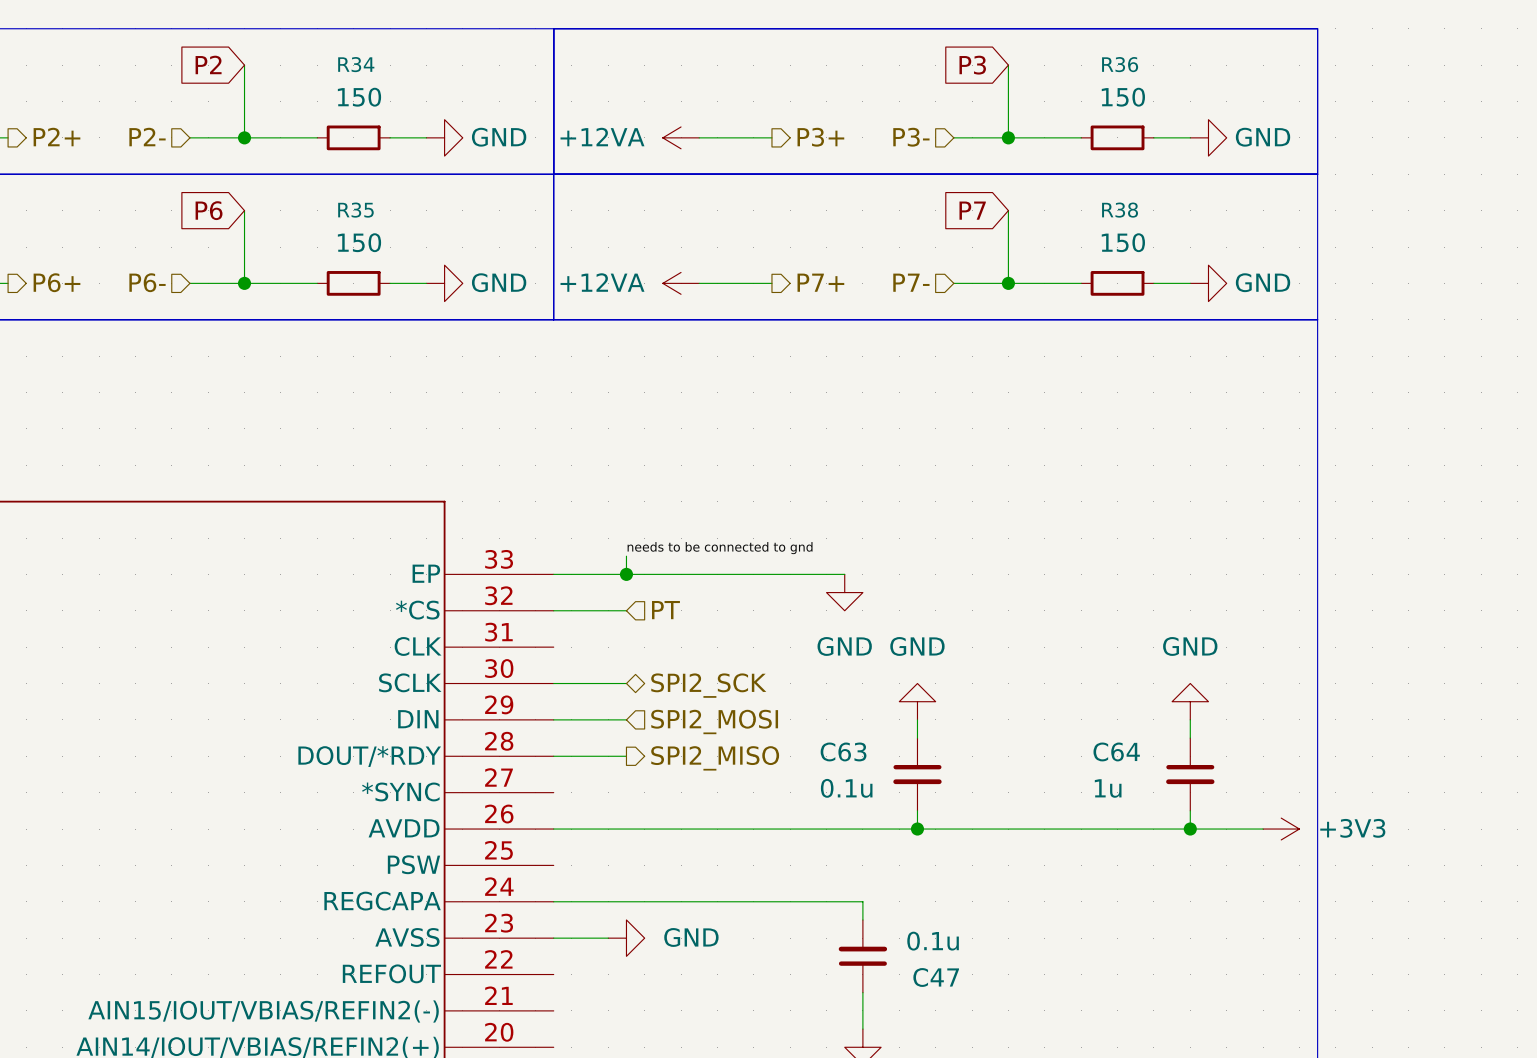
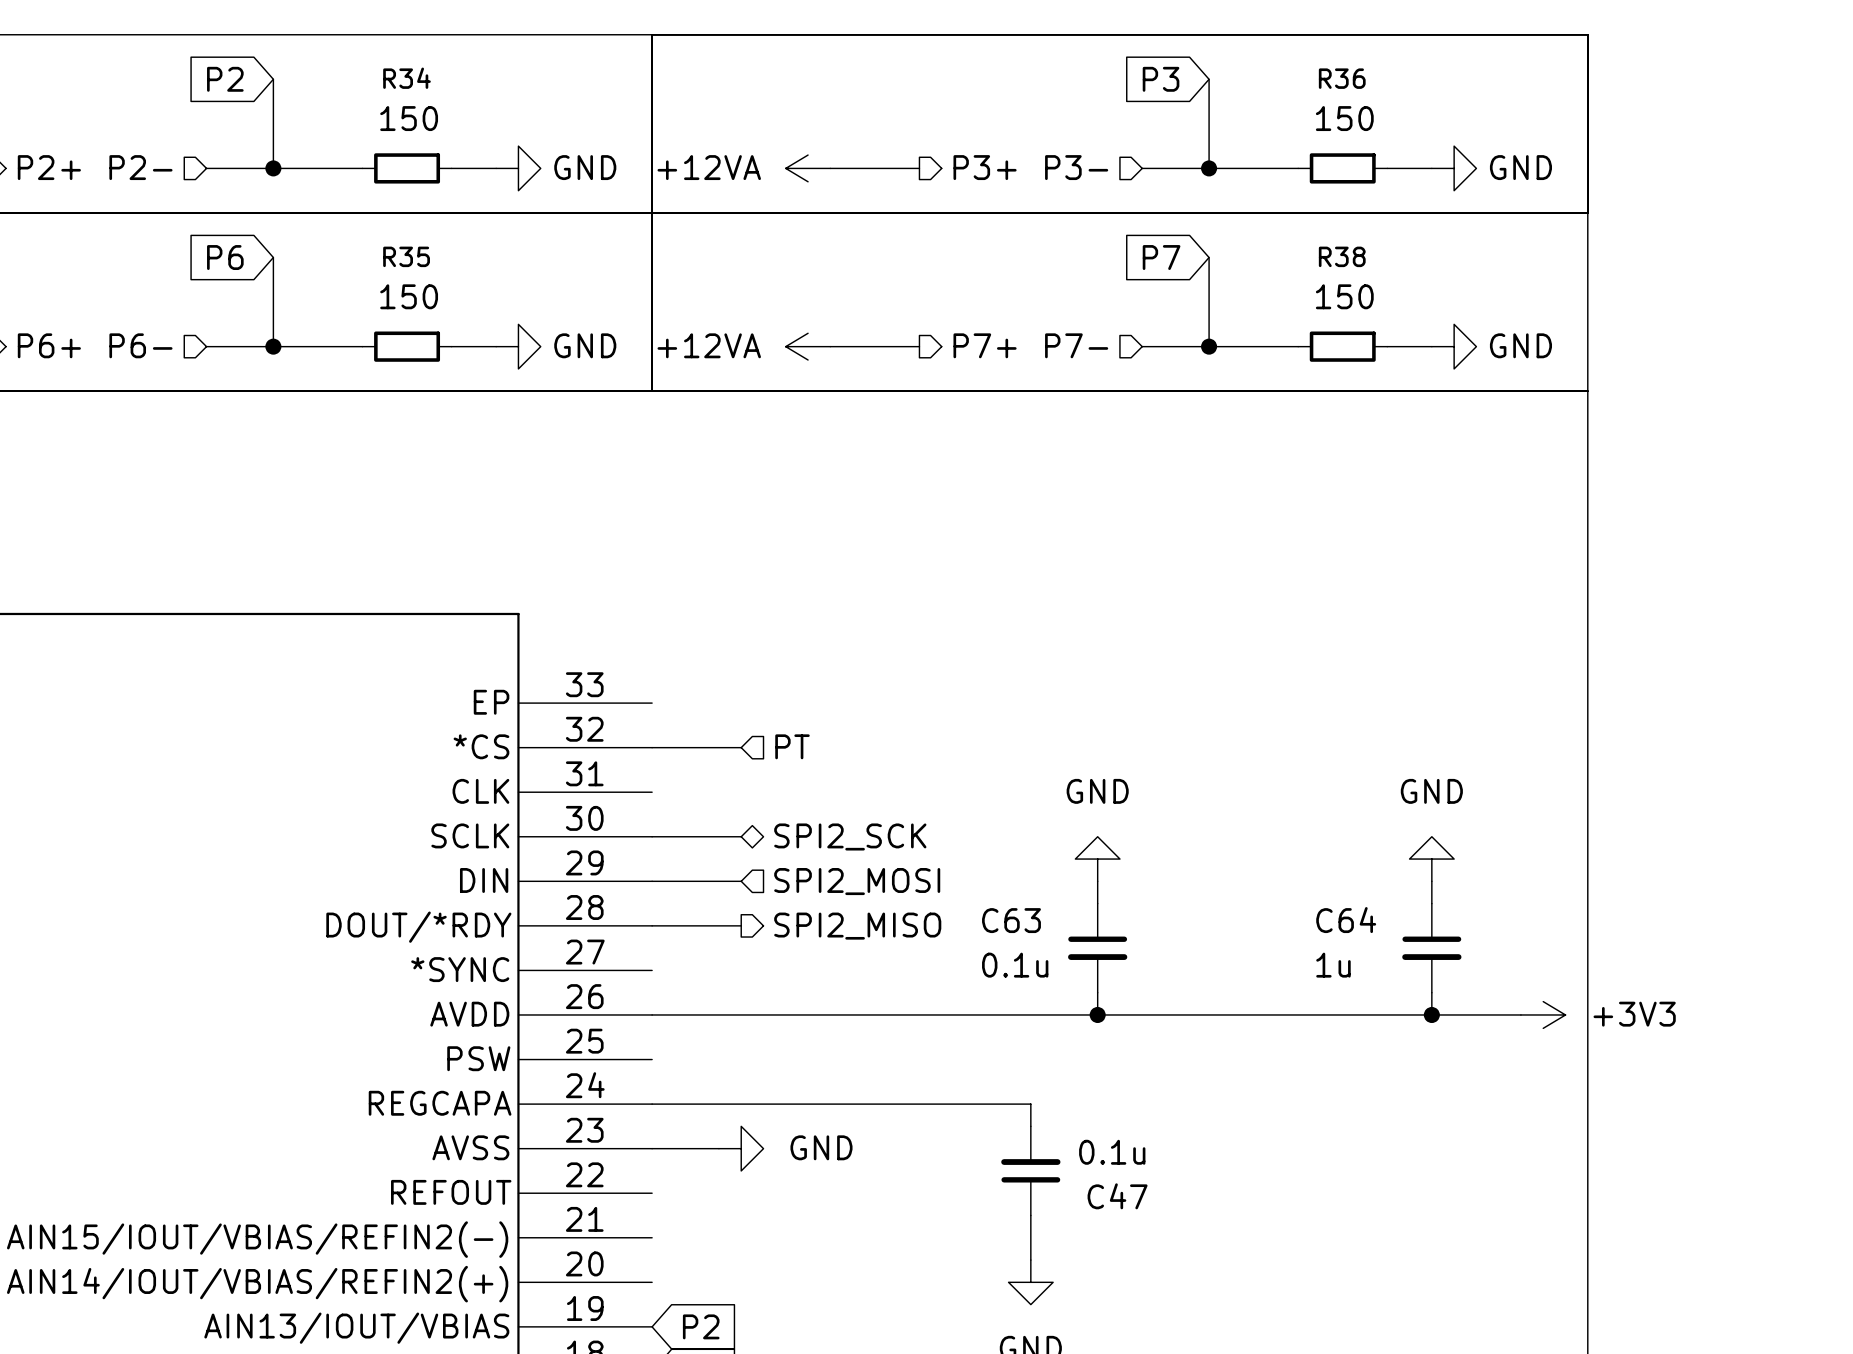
label: needs to be connected to gnd (720, 548) -> none
wire: (626, 556) (626, 574) -> none
wire: (553, 574) (844, 574) -> none
junction: (626, 574) -> none
power symbol: GND (844, 592) -> none

